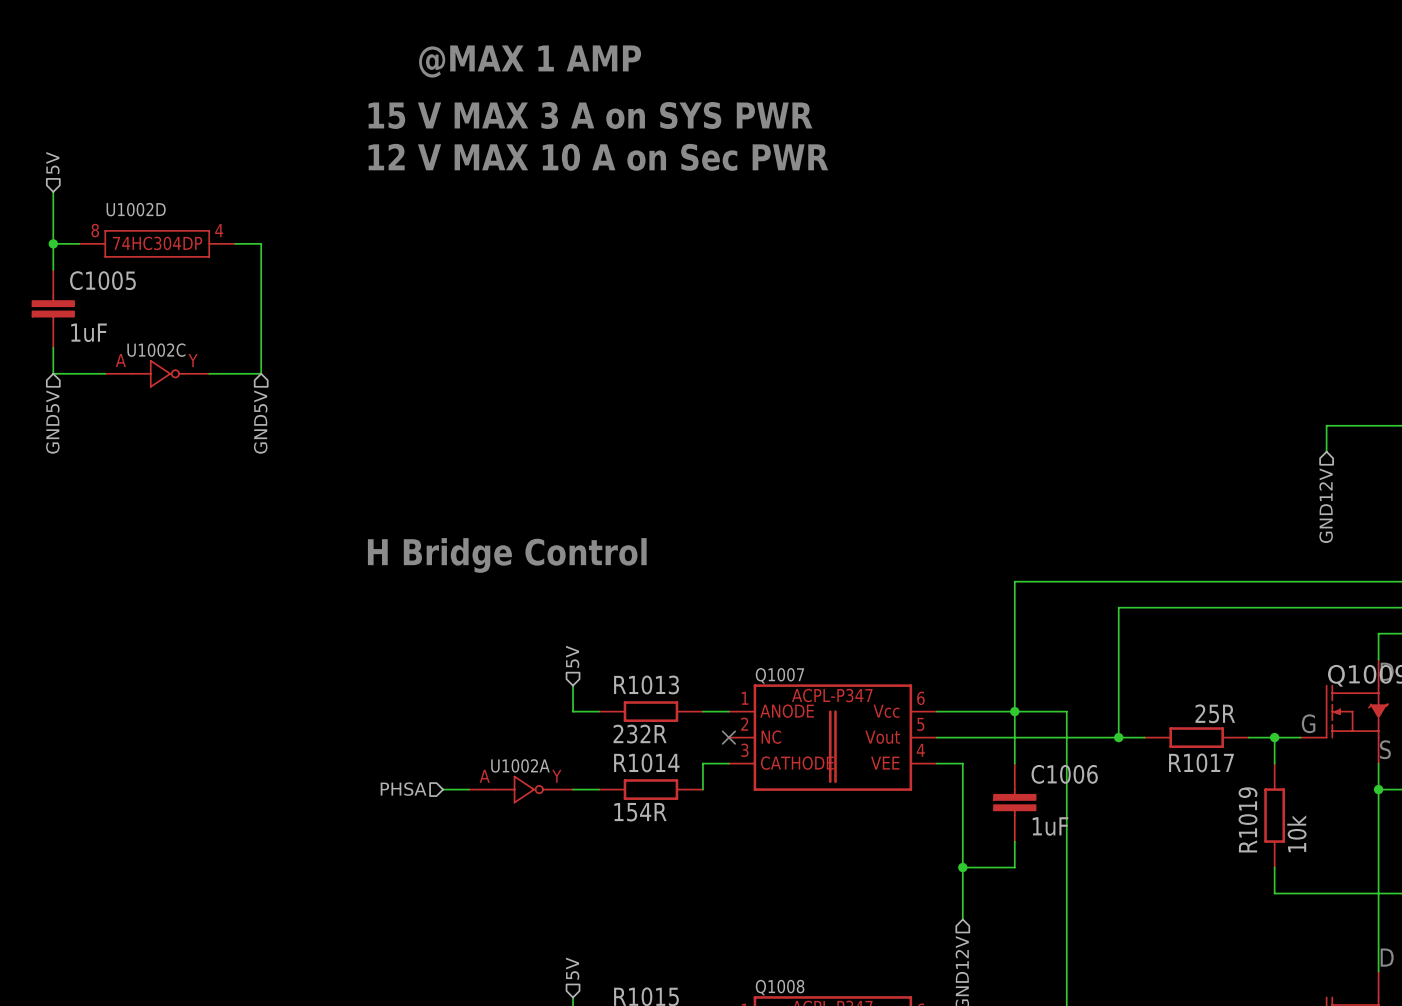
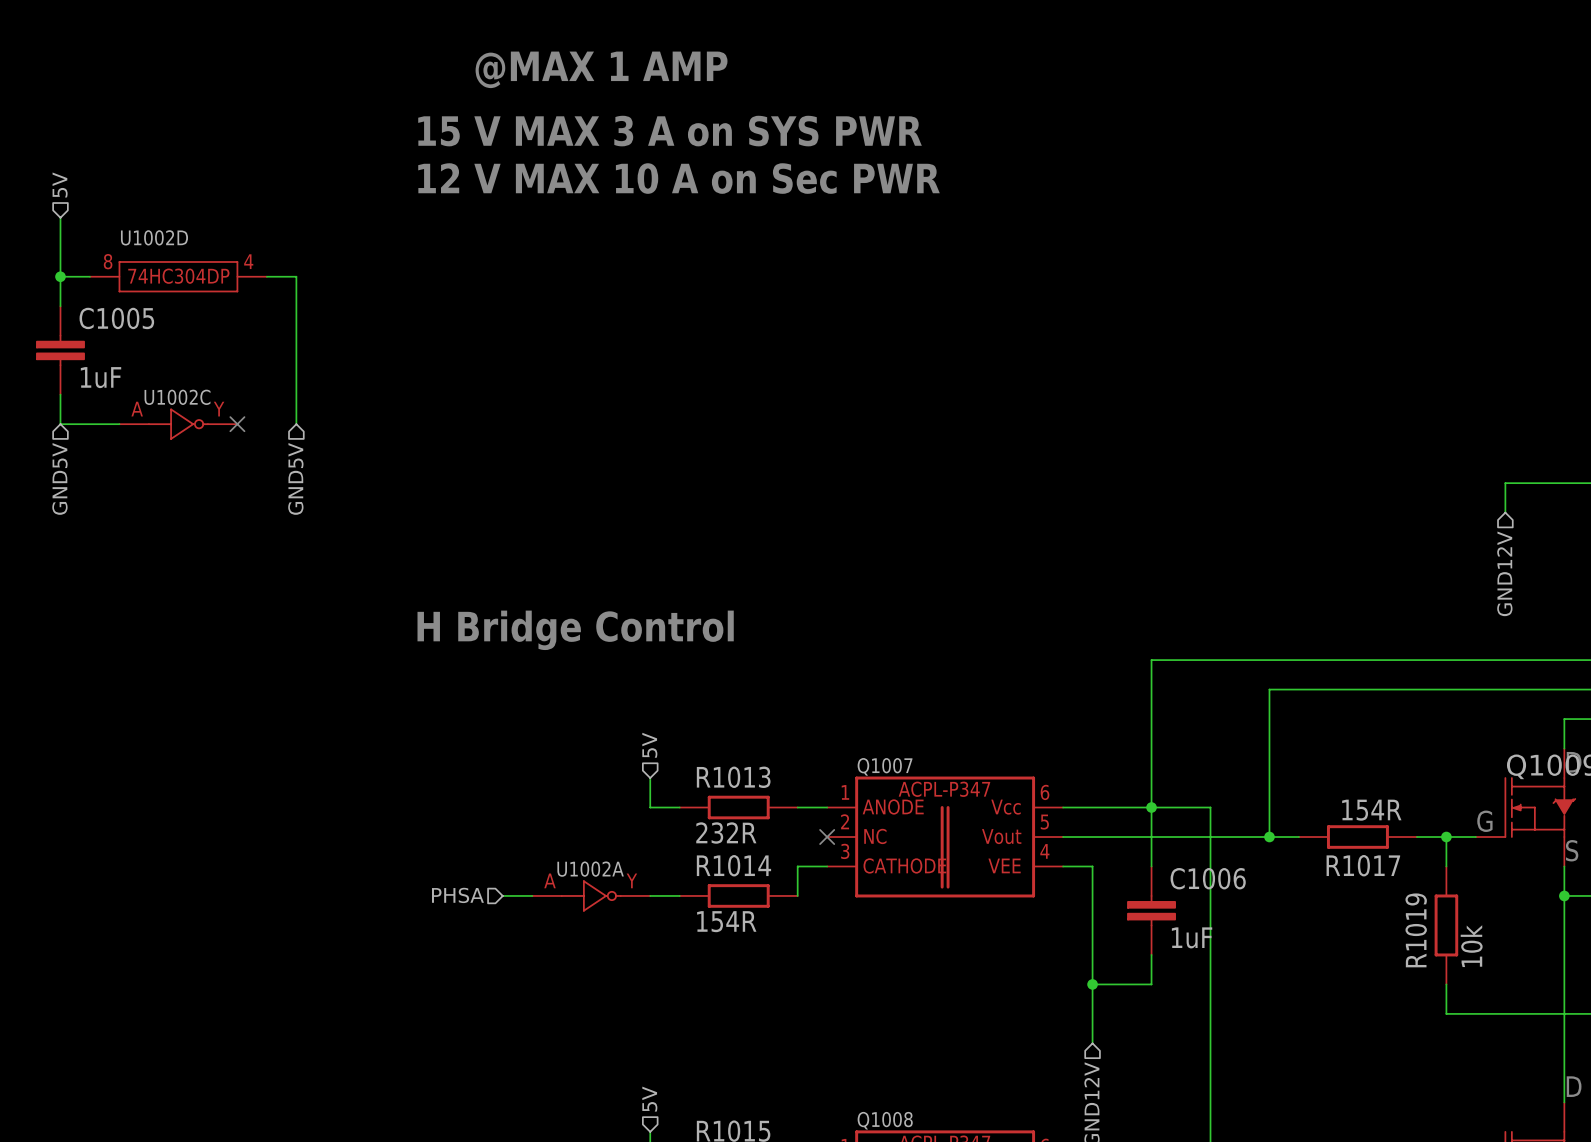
wire: (209, 373) (261, 373) -> none
no-connect mark: none -> (237, 424)
R1017 value: 25R (1215, 713) -> 154R (1371, 810)

